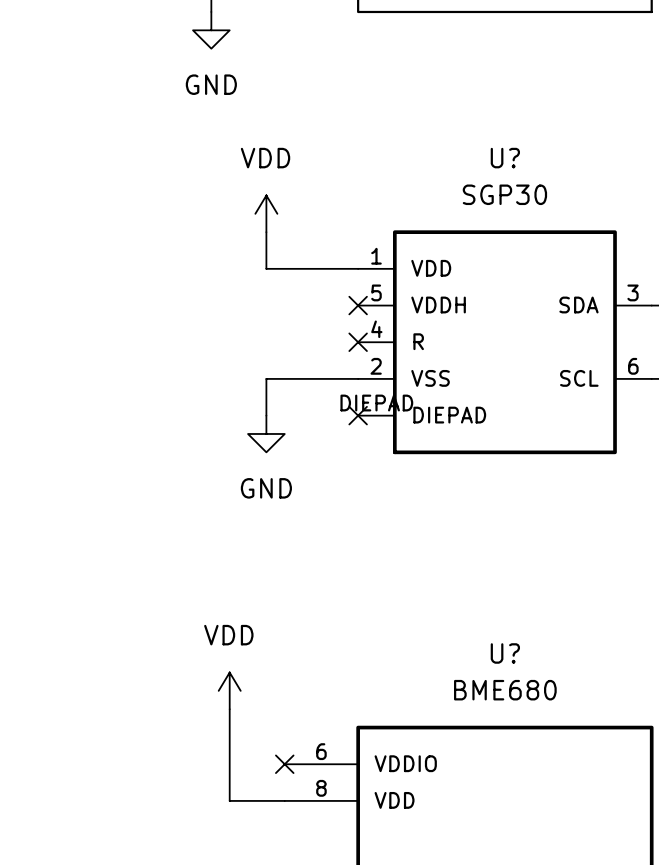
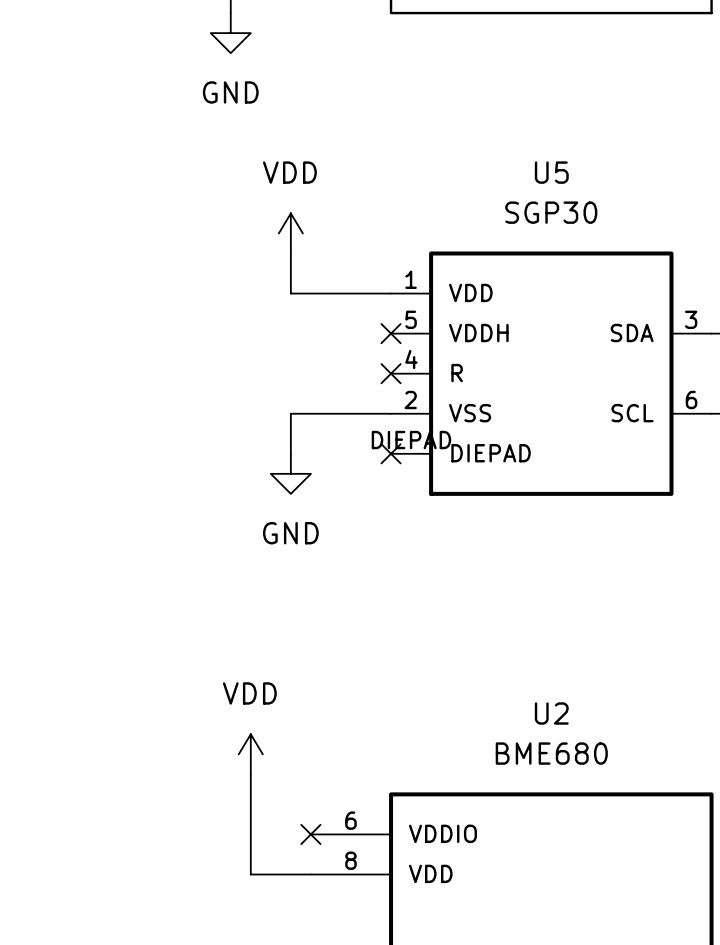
U? name: U? (505, 158) -> U5 (551, 172)
U? name: U? (505, 653) -> U2 (551, 713)

